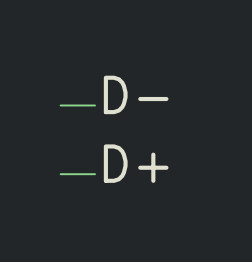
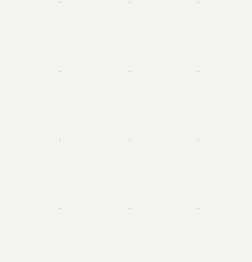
label: D- (136, 94) -> none
wire: (60, 105) (95, 105) -> none
label: D+ (136, 163) -> none
wire: (60, 174) (95, 174) -> none

